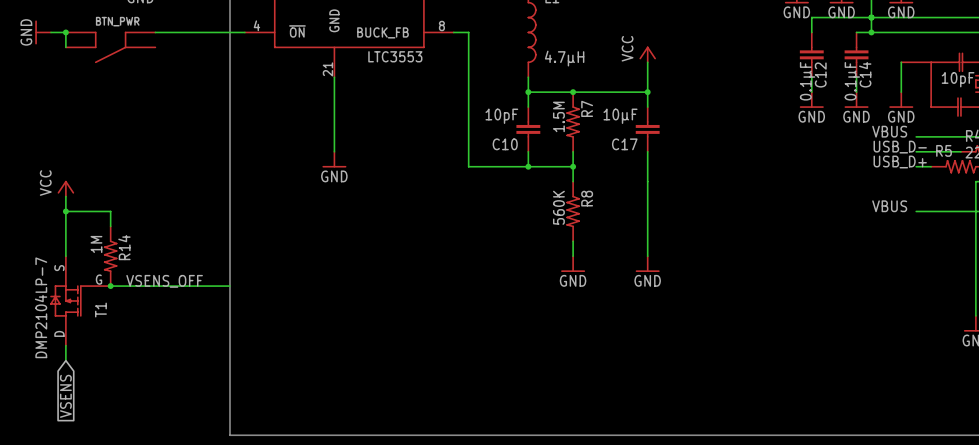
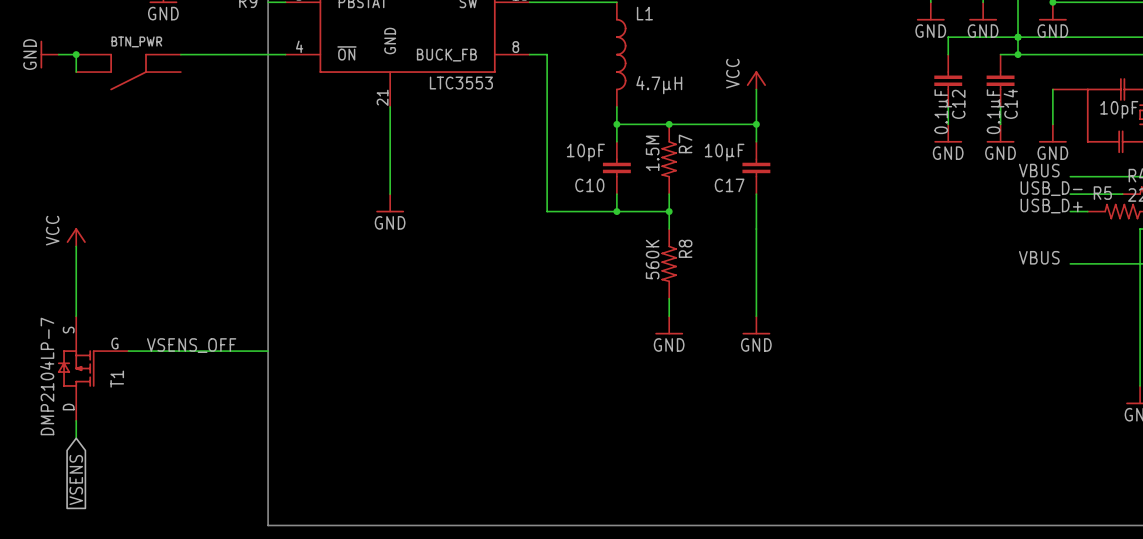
wire: (65, 211) (110, 211) (110, 226) -> none
junction: (65, 211) -> none
R14: 1M (110, 256) -> none
junction: (110, 286) -> none

